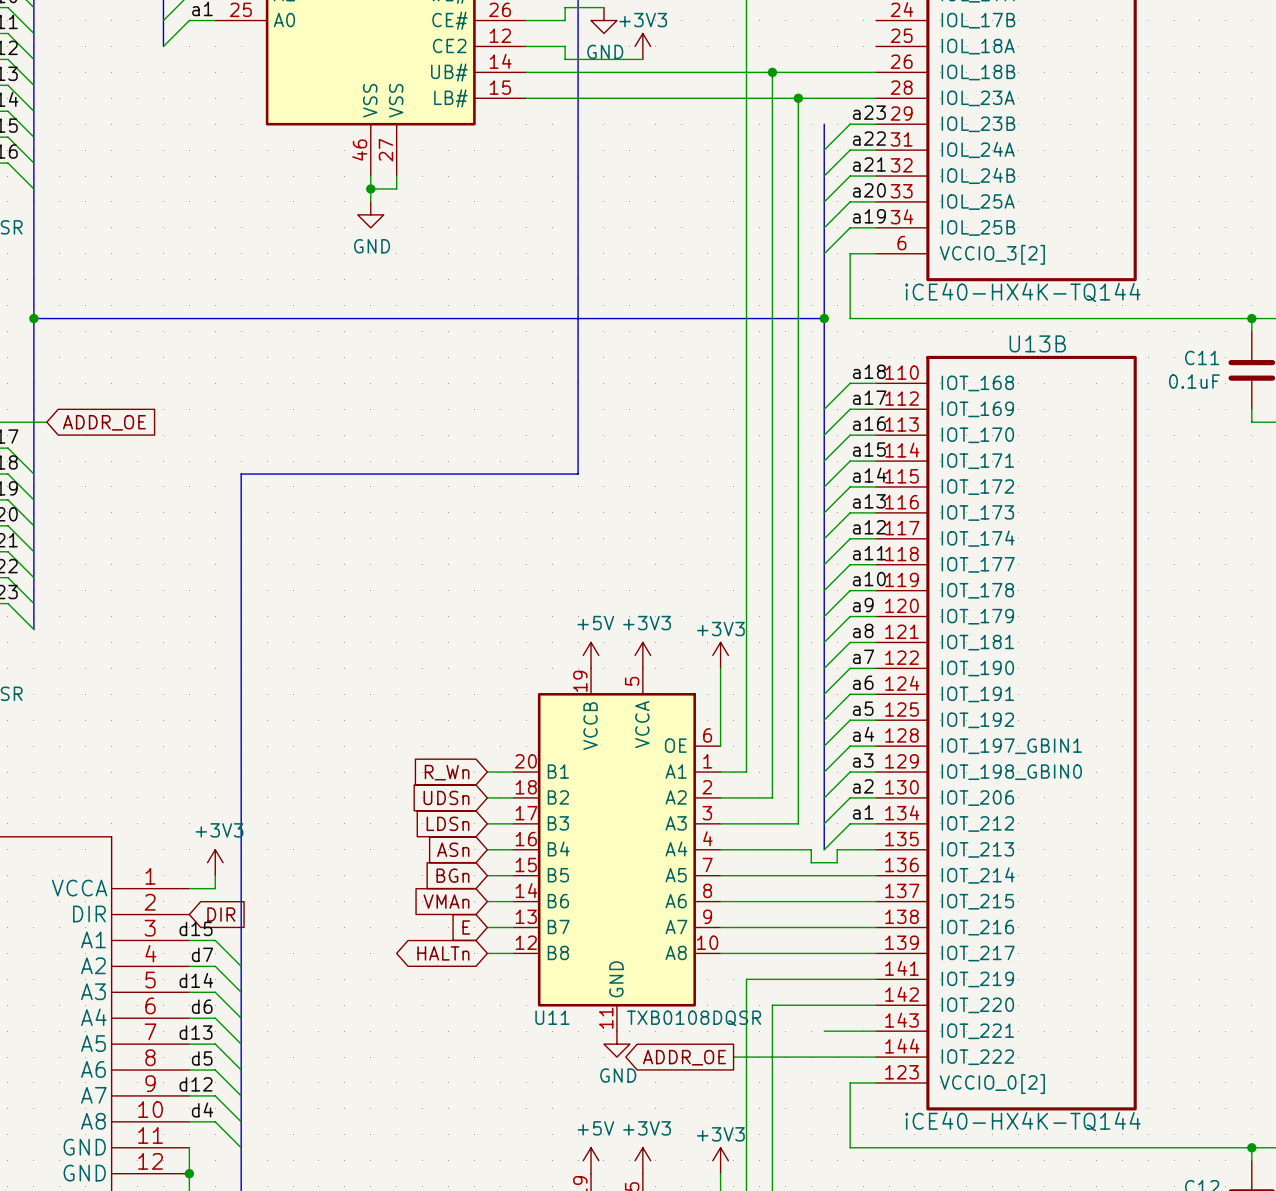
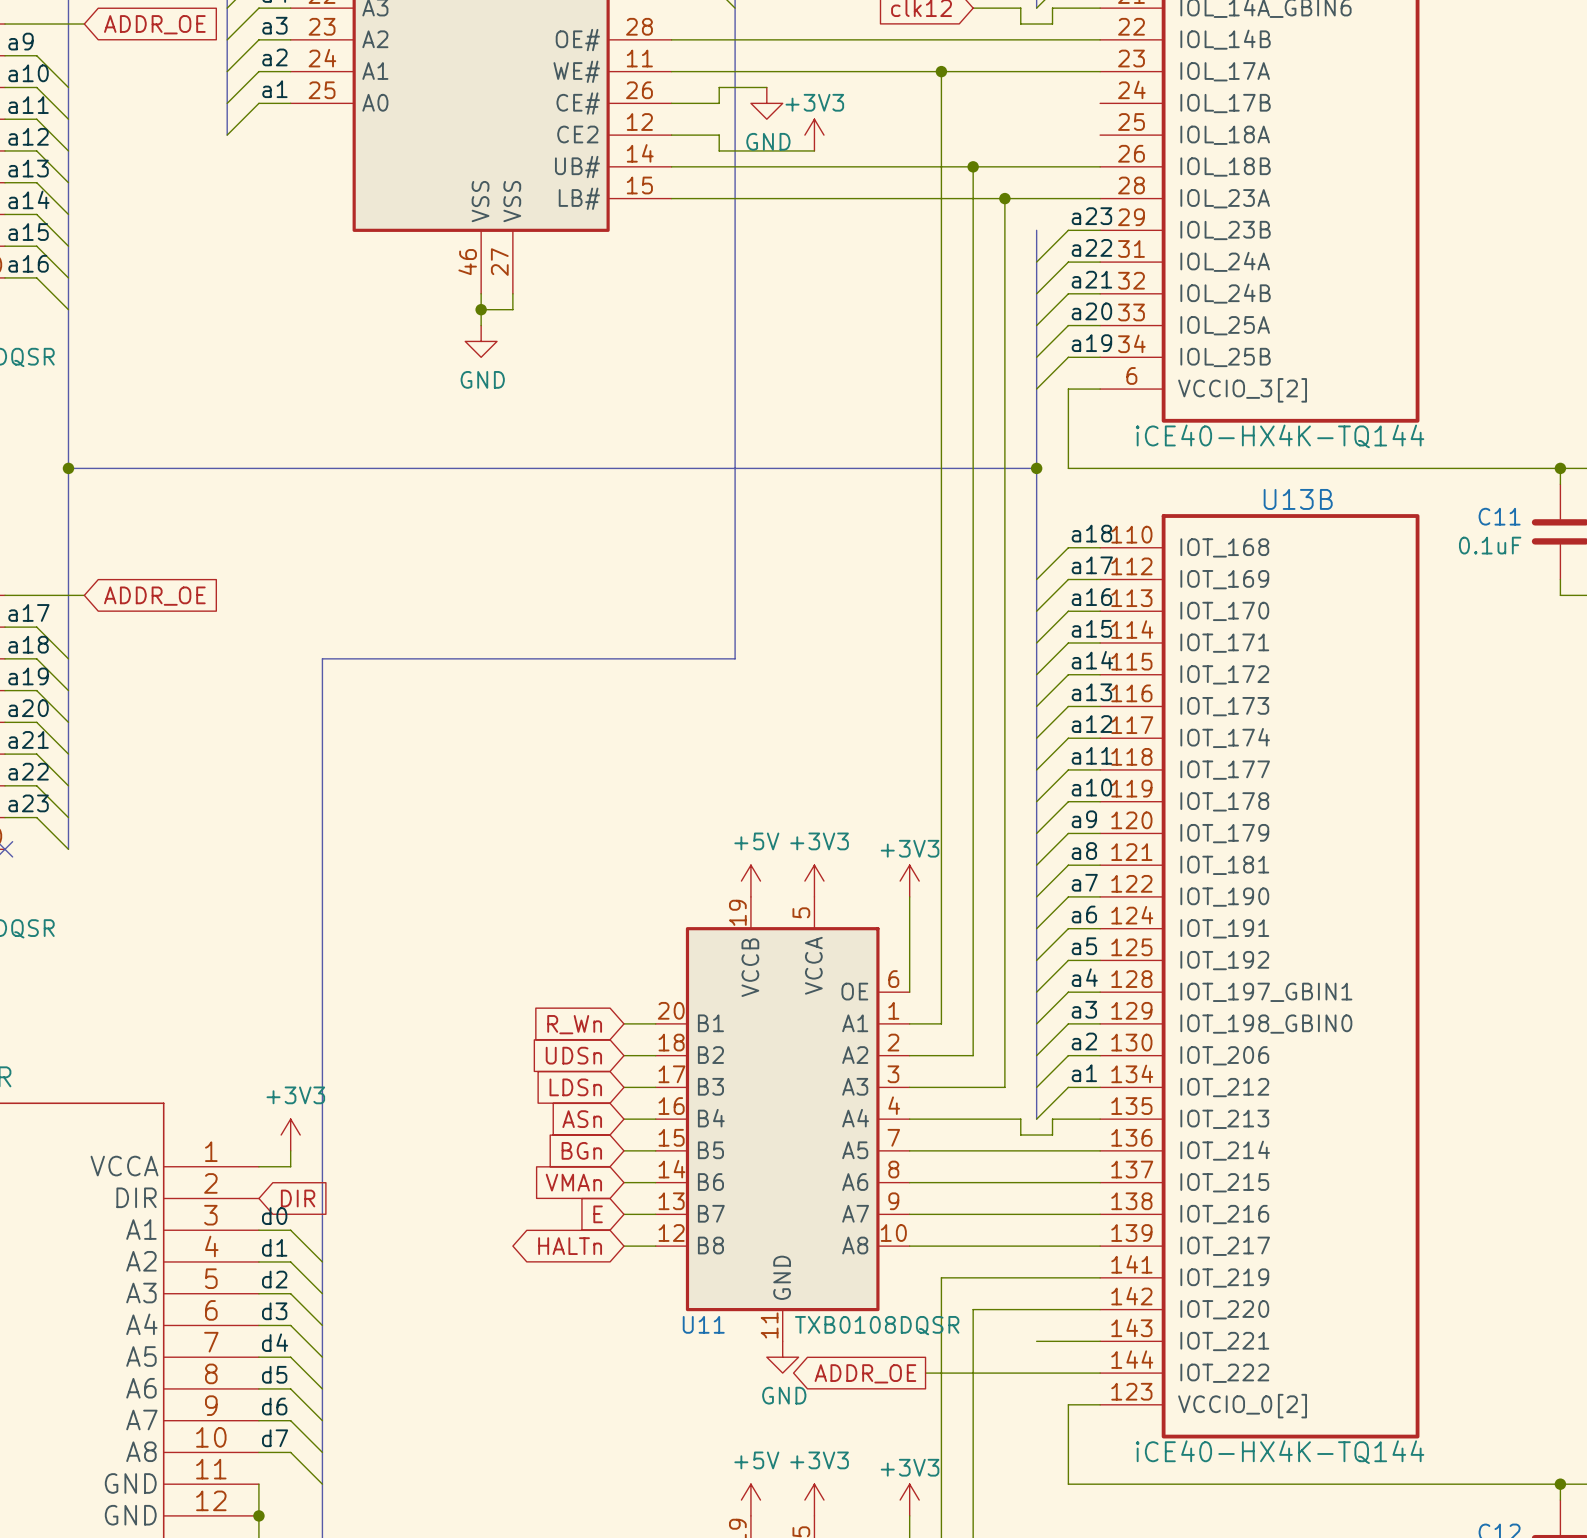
label: d15 (196, 928) -> d0 (274, 1216)
label: d7 (202, 954) -> d1 (274, 1247)
label: d14 (196, 980) -> d2 (274, 1279)
label: d6 (202, 1006) -> d3 (274, 1311)
label: d13 (196, 1032) -> d4 (275, 1342)
label: d12 (196, 1084) -> d6 (274, 1406)
label: d4 (202, 1109) -> d7 (275, 1438)

